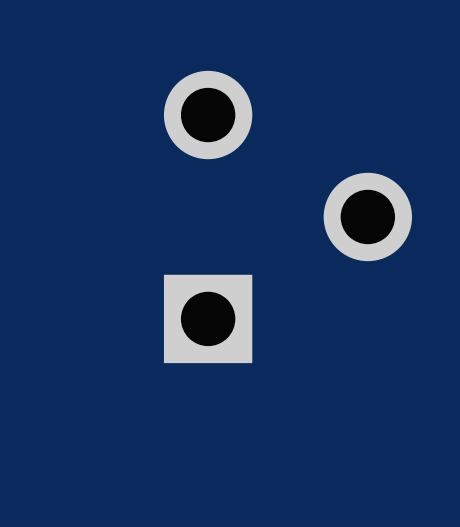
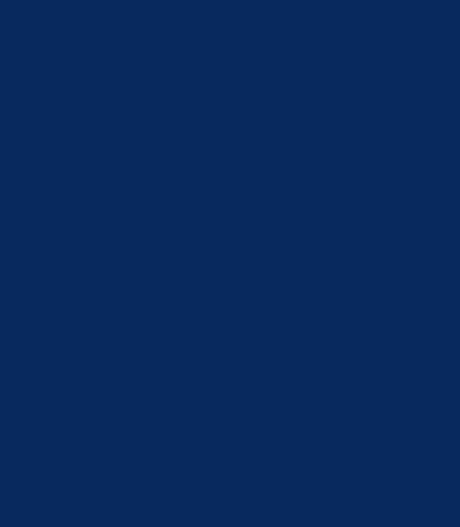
part: (287, 216) -> none

